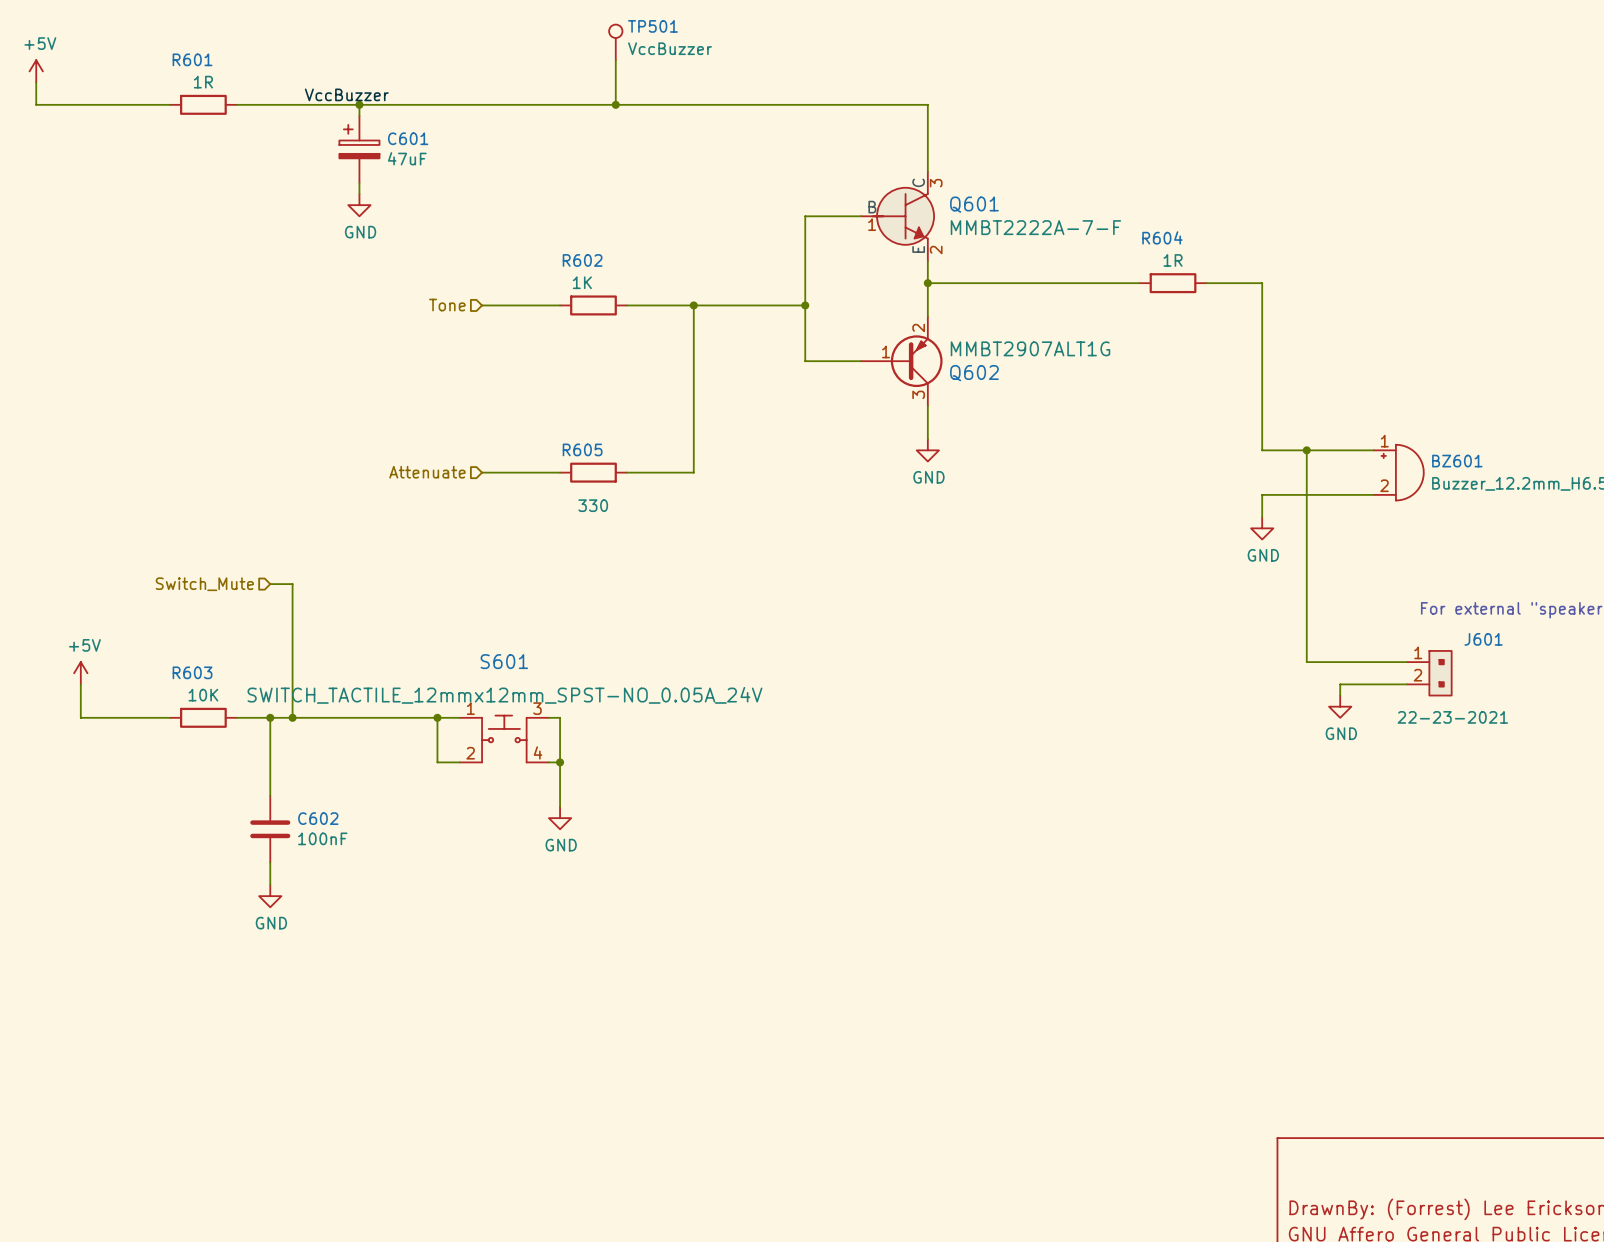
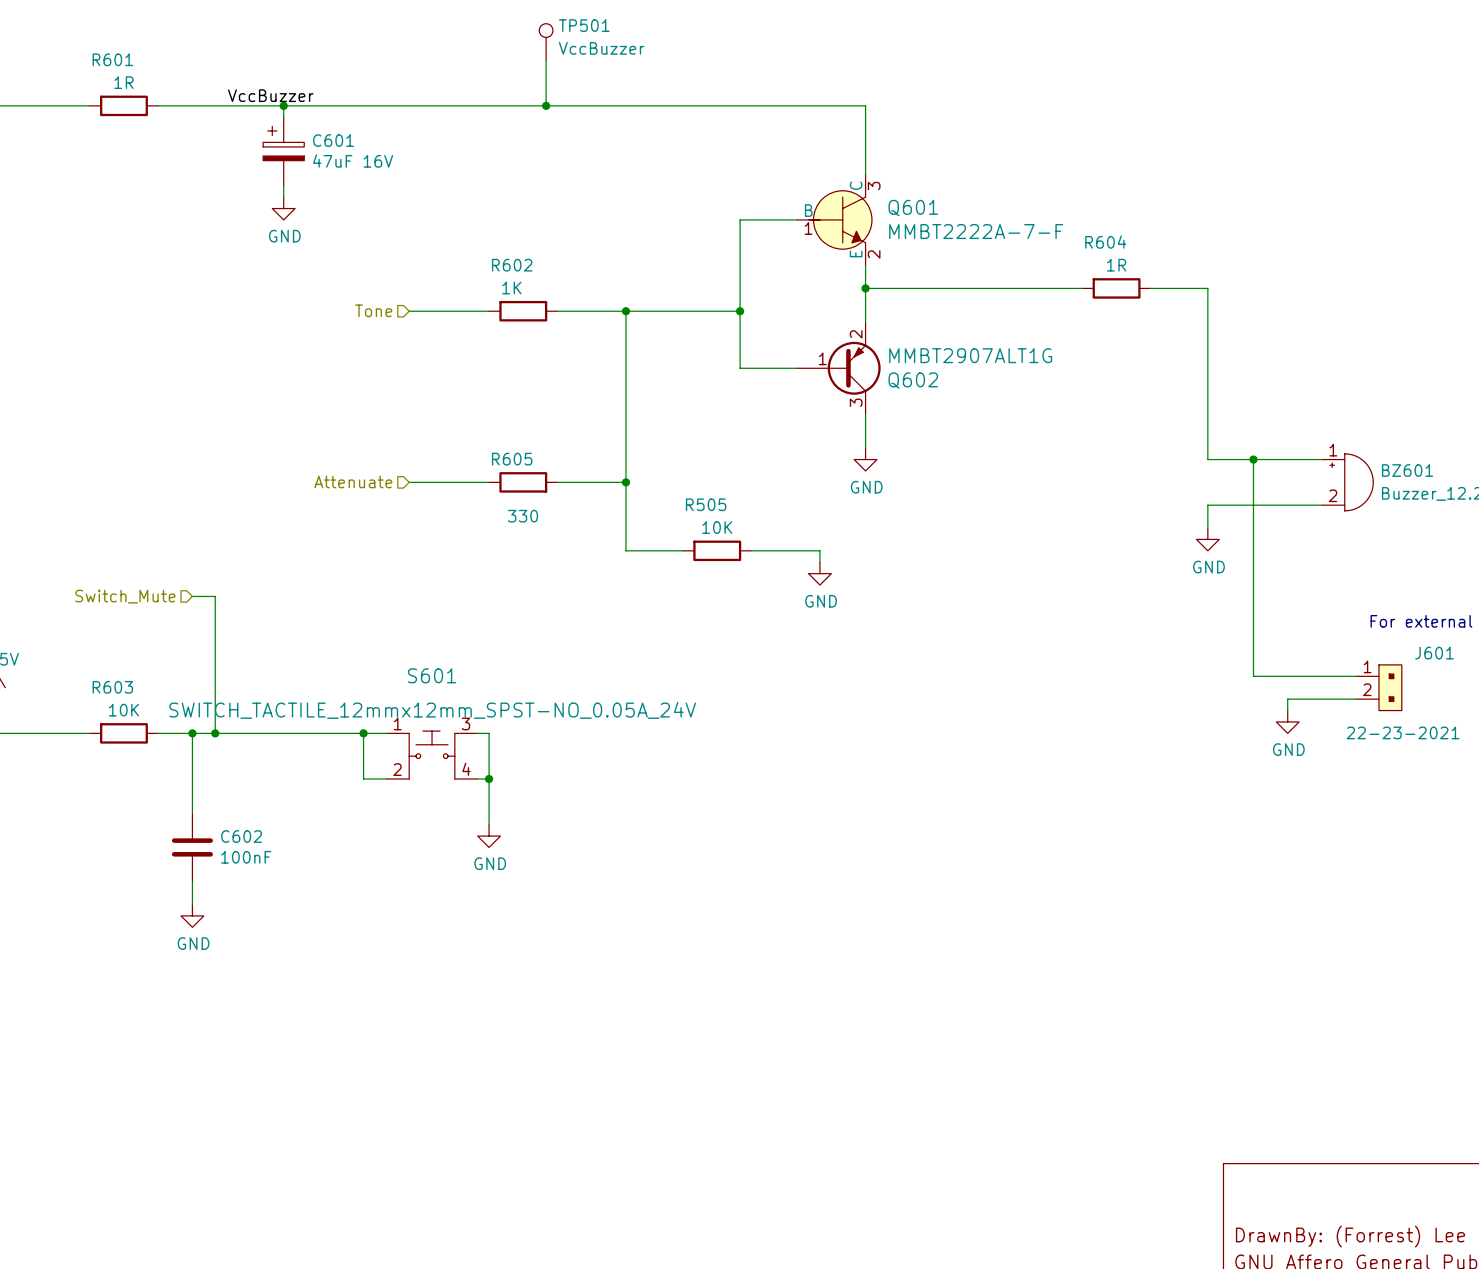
C601 value: 47uF (407, 158) -> 47uF 16V (353, 161)
wire: none -> (625, 482) (625, 550) (683, 550)
junction: none -> (625, 482)
R505: none -> 10K (717, 550)
wire: none -> (751, 550) (819, 550) (819, 562)
power symbol: none -> GND (819, 573)

